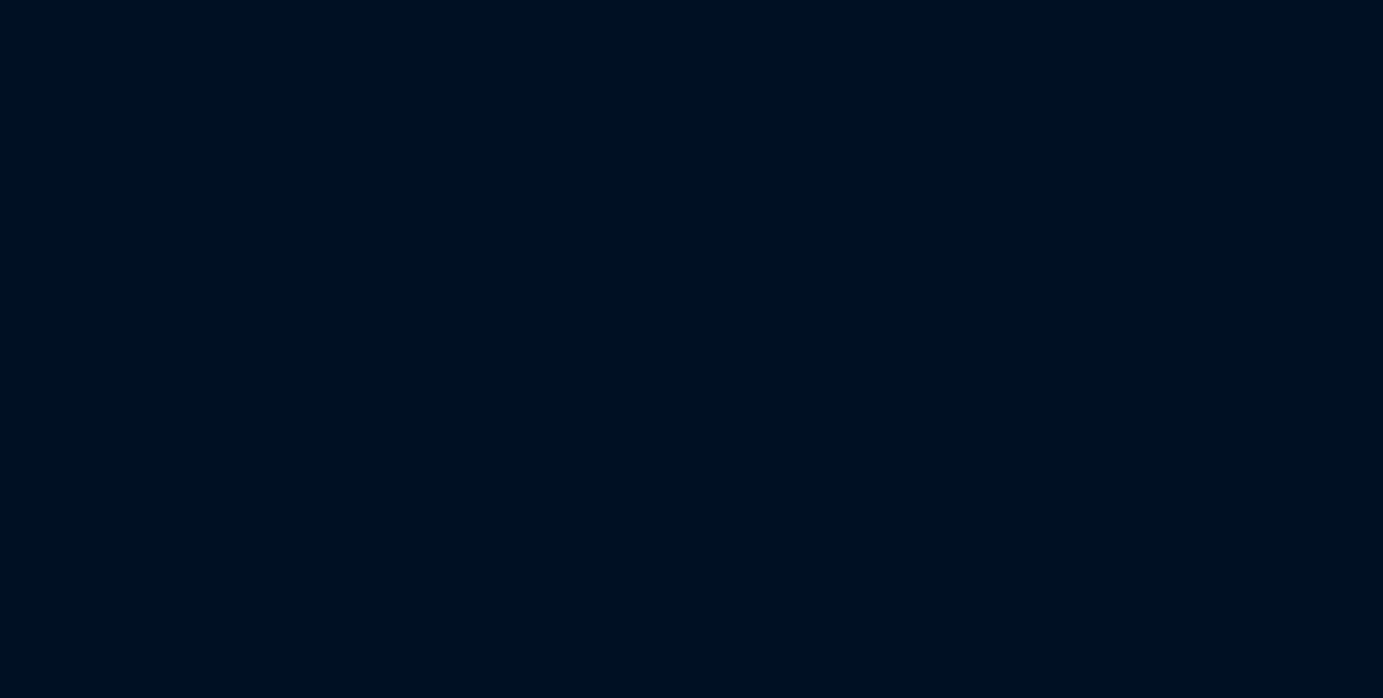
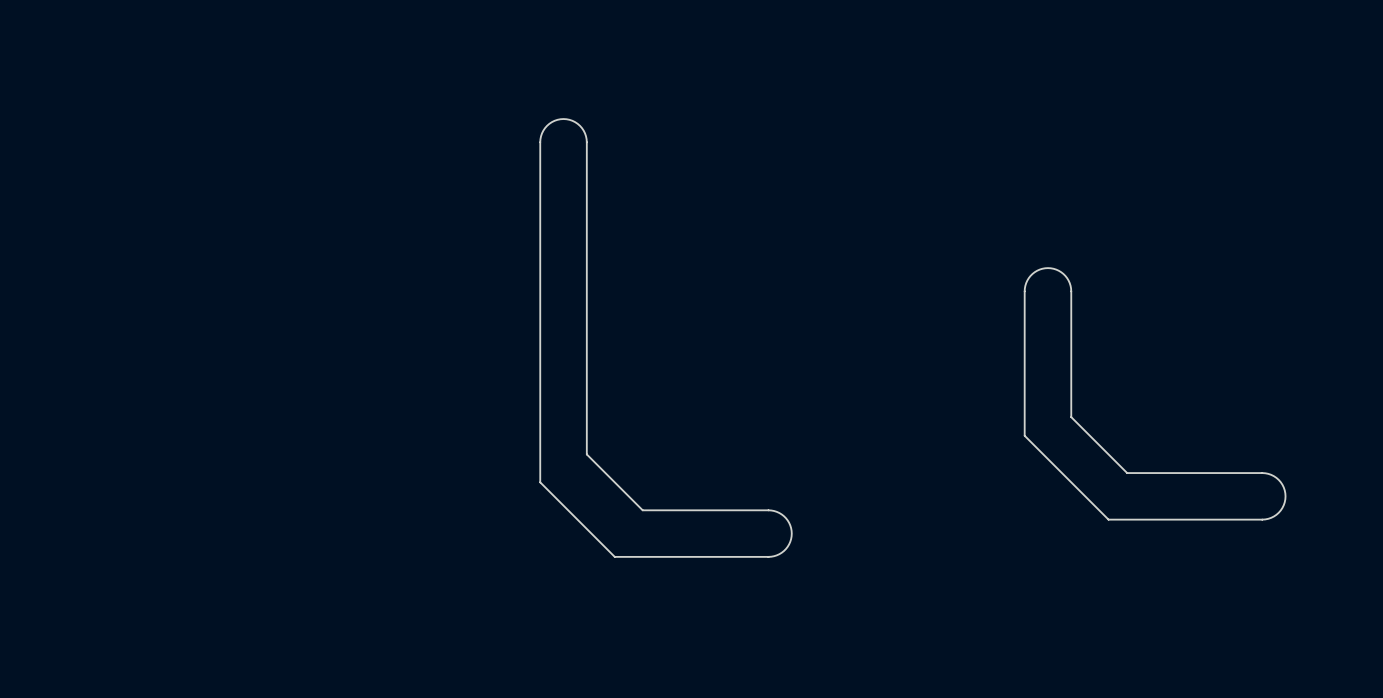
board edge: none -> (540, 142) (540, 482) (614, 556) (768, 556) (779, 554) (787, 546) (791, 533) (789, 522) (779, 512) (768, 510) (642, 510) (586, 454) (586, 139) (580, 125) (572, 120) (563, 119) (554, 120) (547, 125) (542, 133) (540, 142)
board edge: none -> (1024, 291) (1024, 435) (1108, 519) (1262, 519) (1271, 517) (1280, 510) (1284, 502) (1284, 490) (1278, 479) (1268, 473) (1127, 473) (1071, 417) (1071, 291) (1068, 280) (1063, 273) (1056, 269) (1042, 268) (1030, 275) (1026, 283) (1024, 291)

